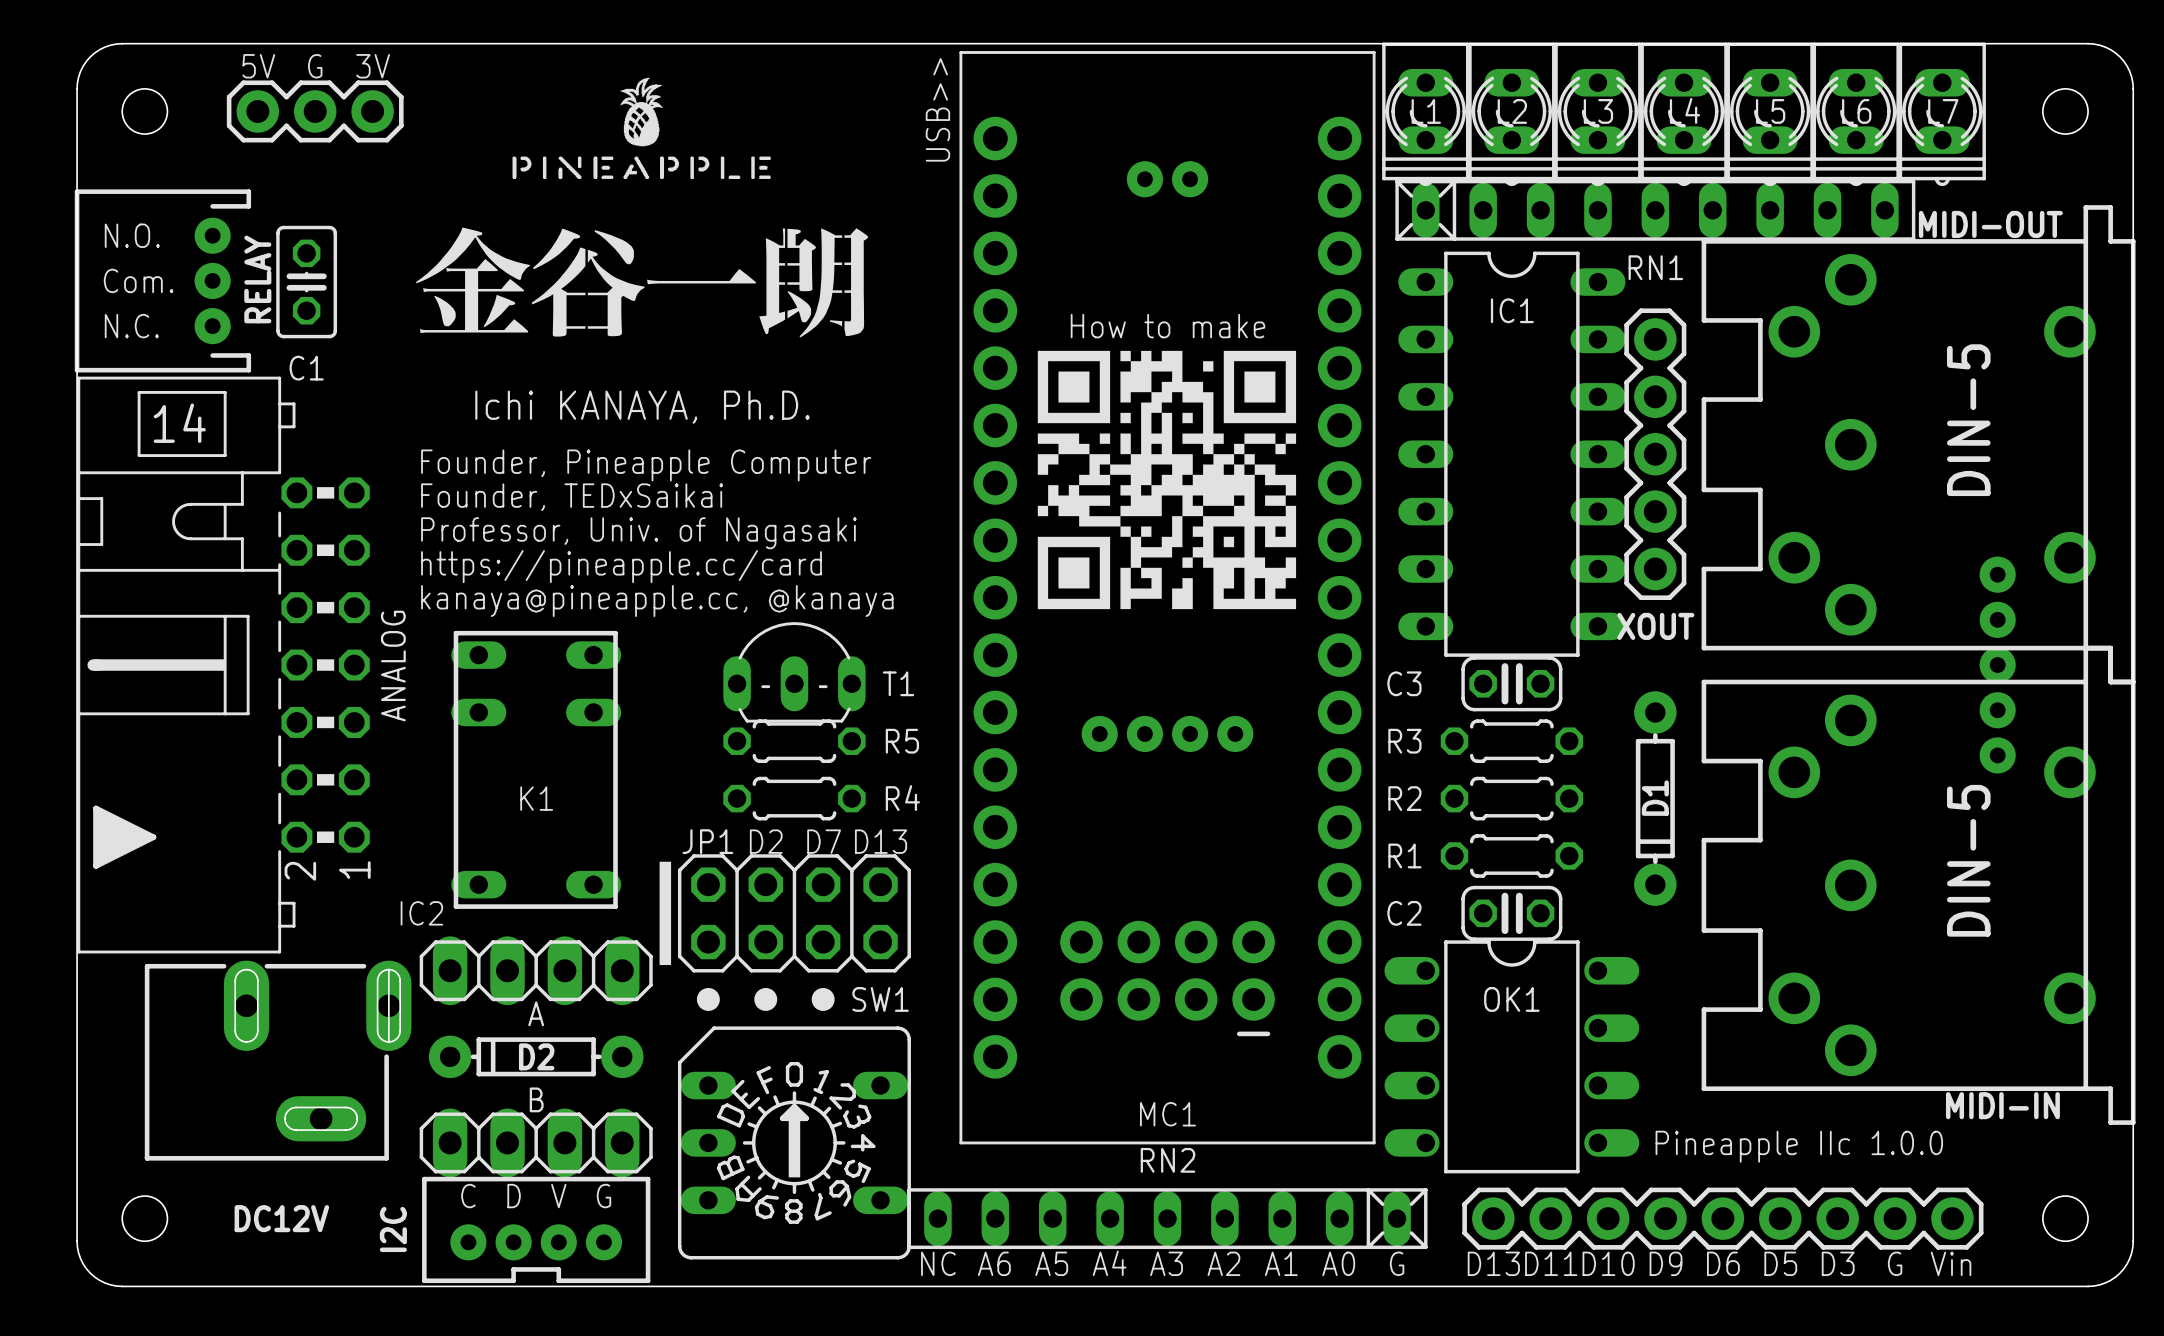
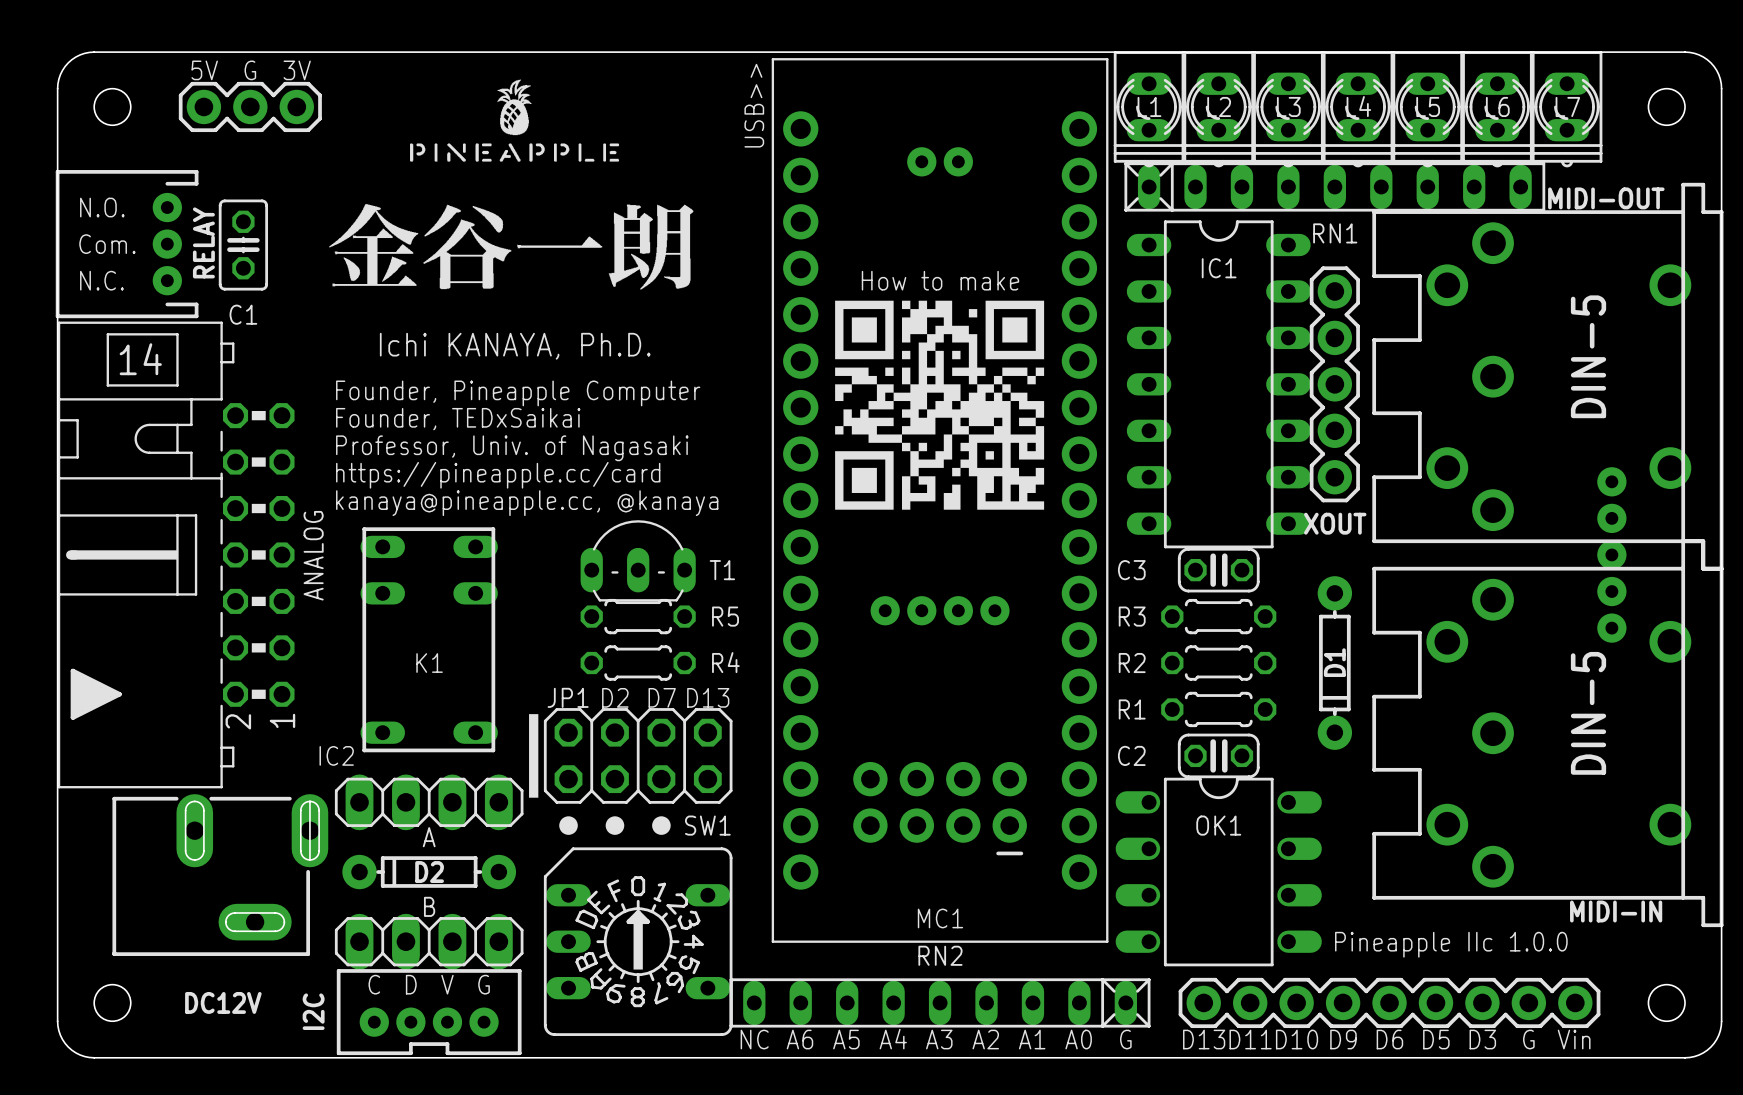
drawing shape: [415, 227, 868, 338] -> [329, 204, 694, 290]

